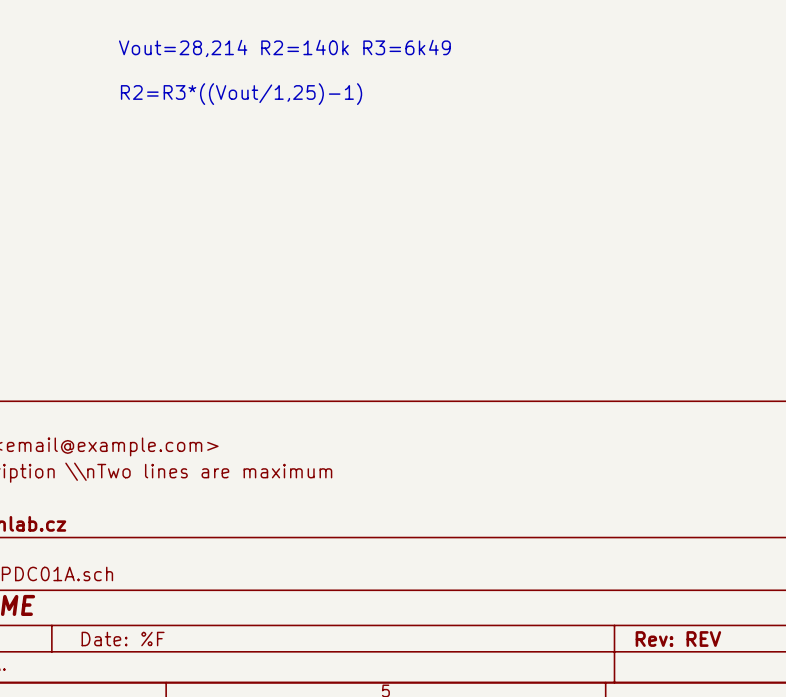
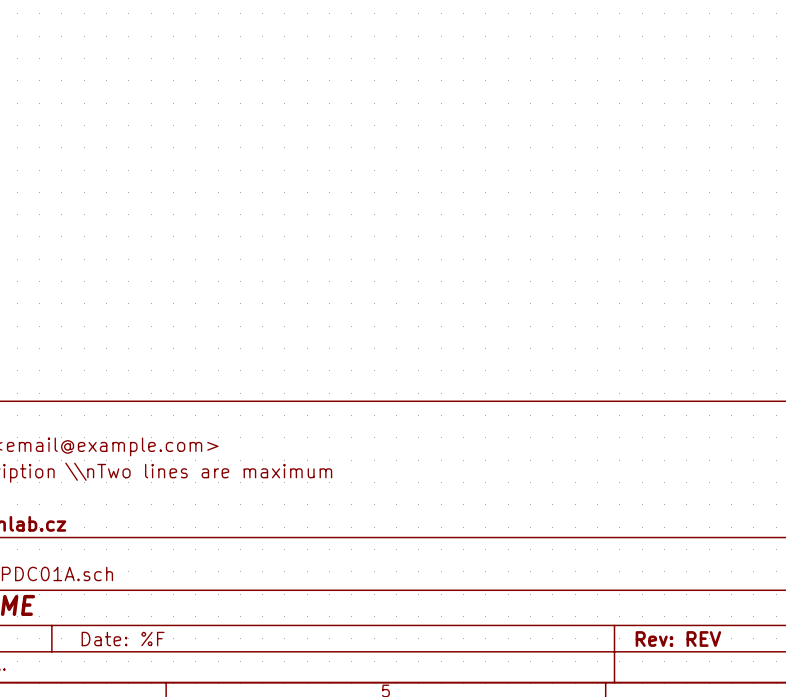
text: Vout=28,214 R2=140k R3=6k49 (284, 48) -> none
text: R2=R3*((Vout/1,25)-1) (241, 94) -> none

